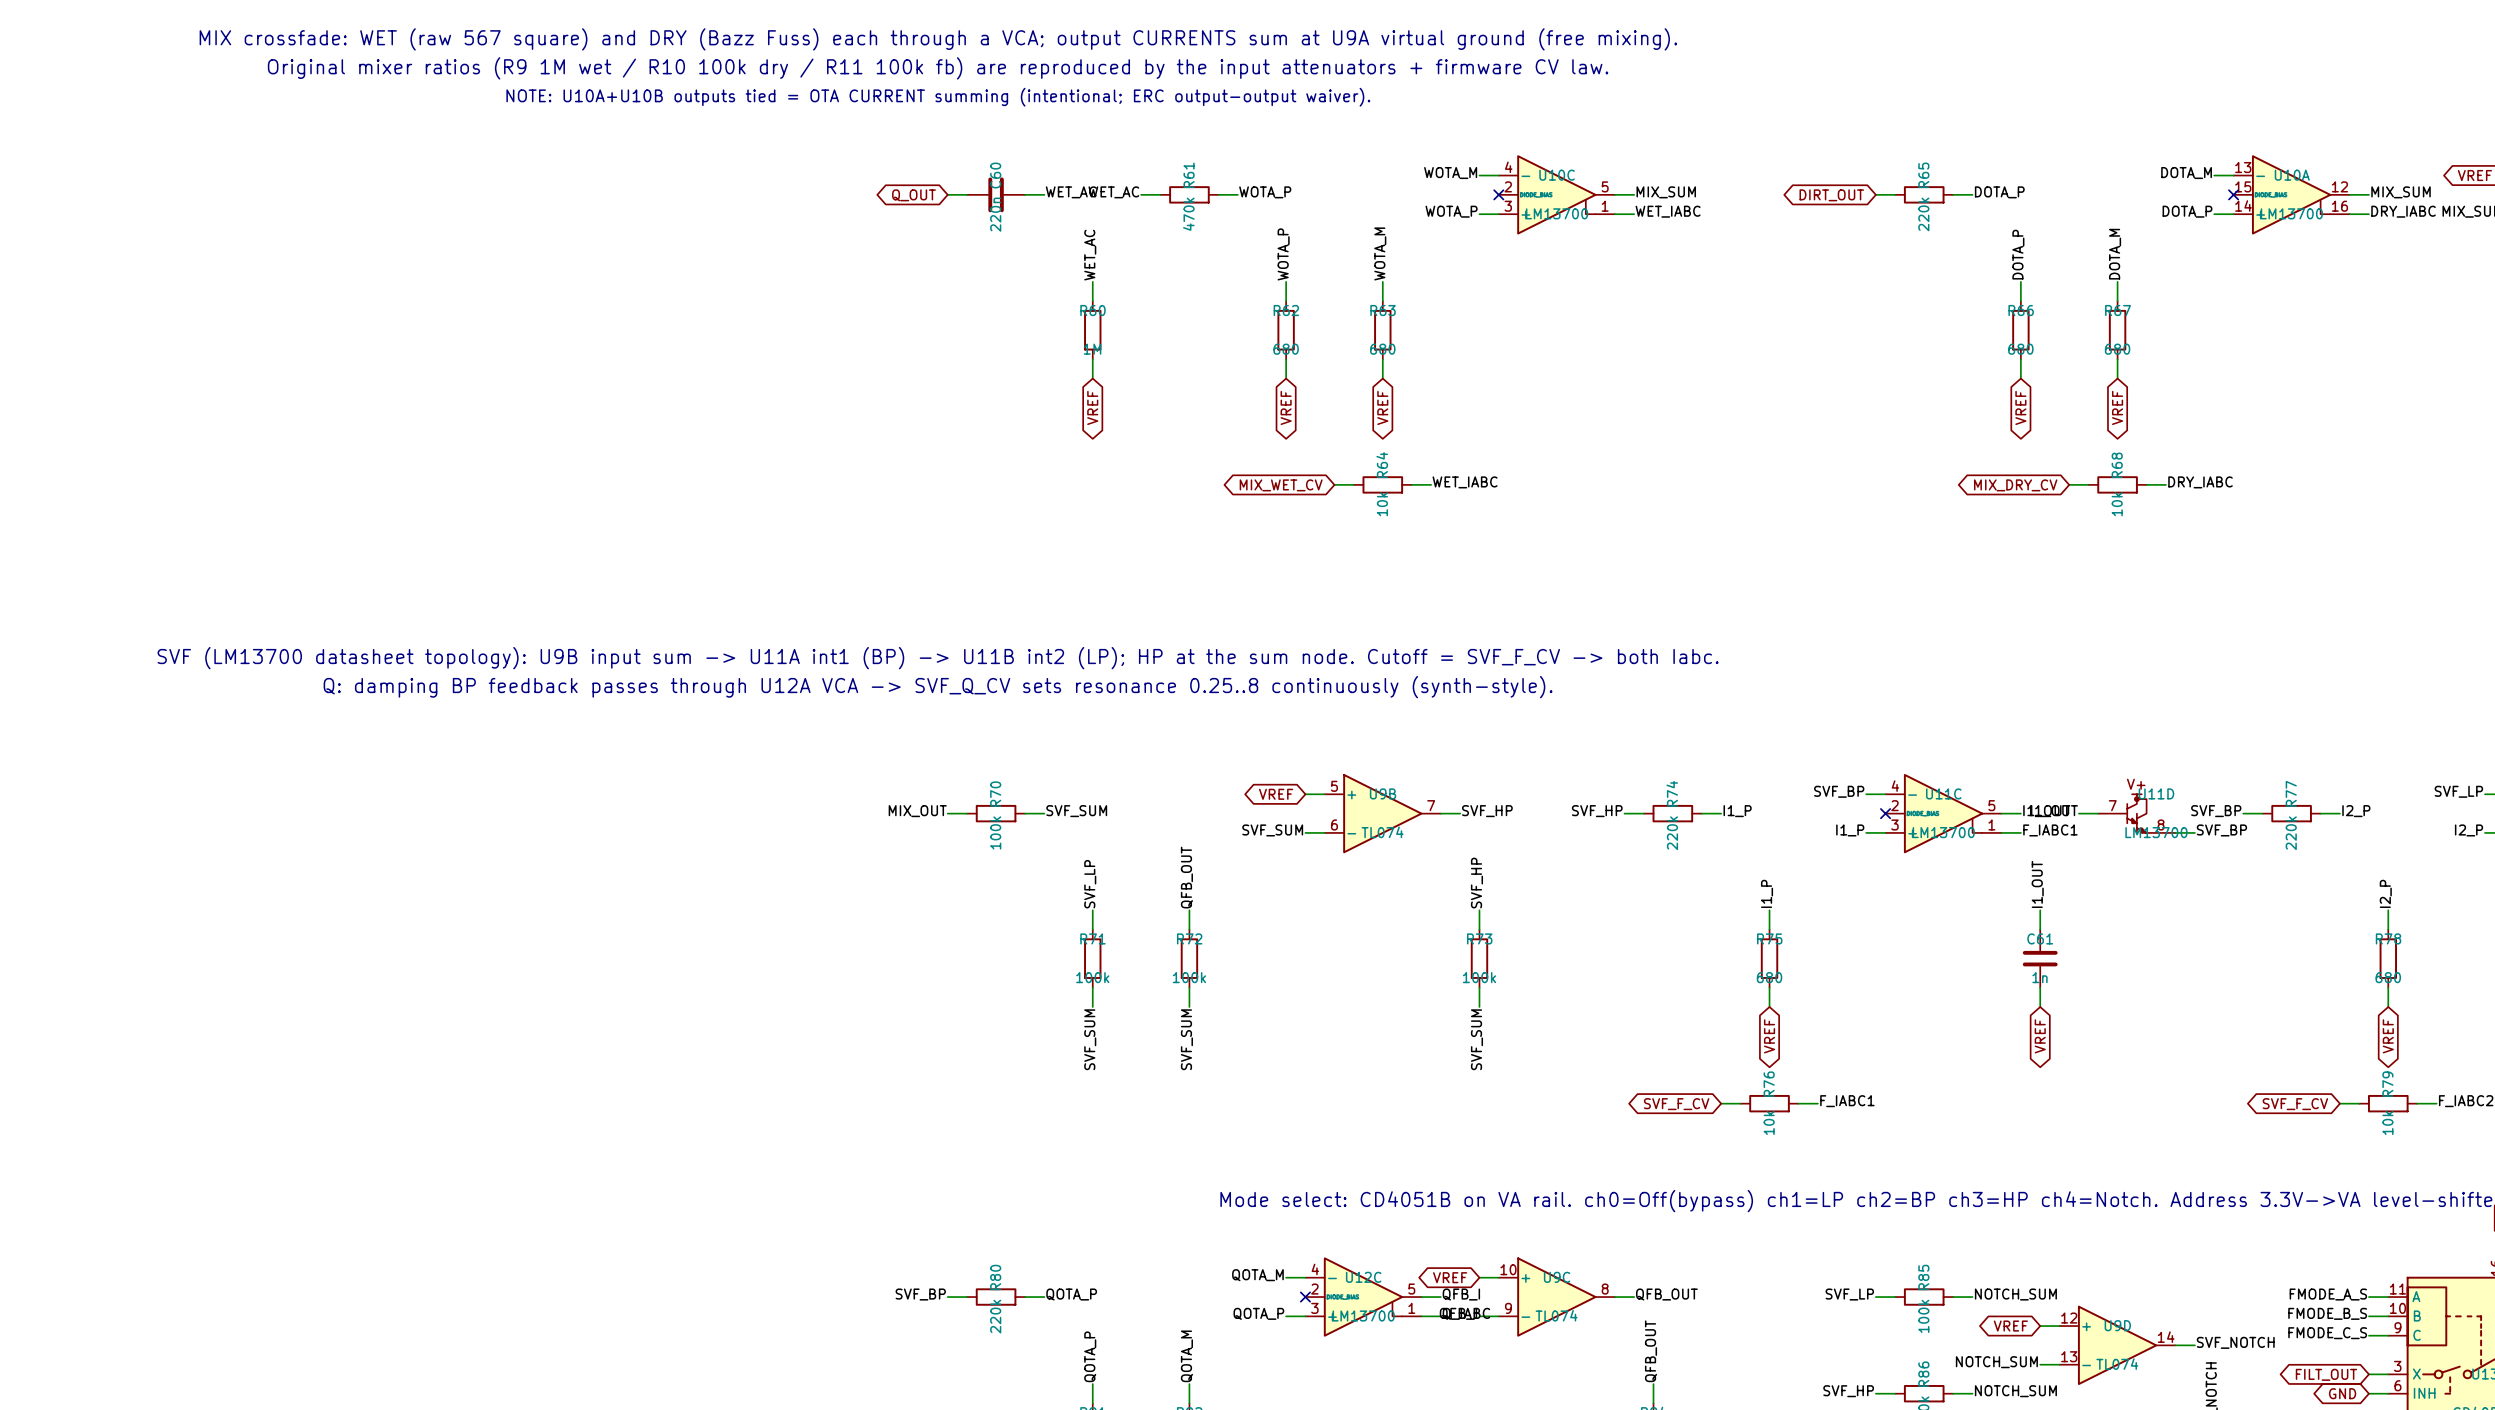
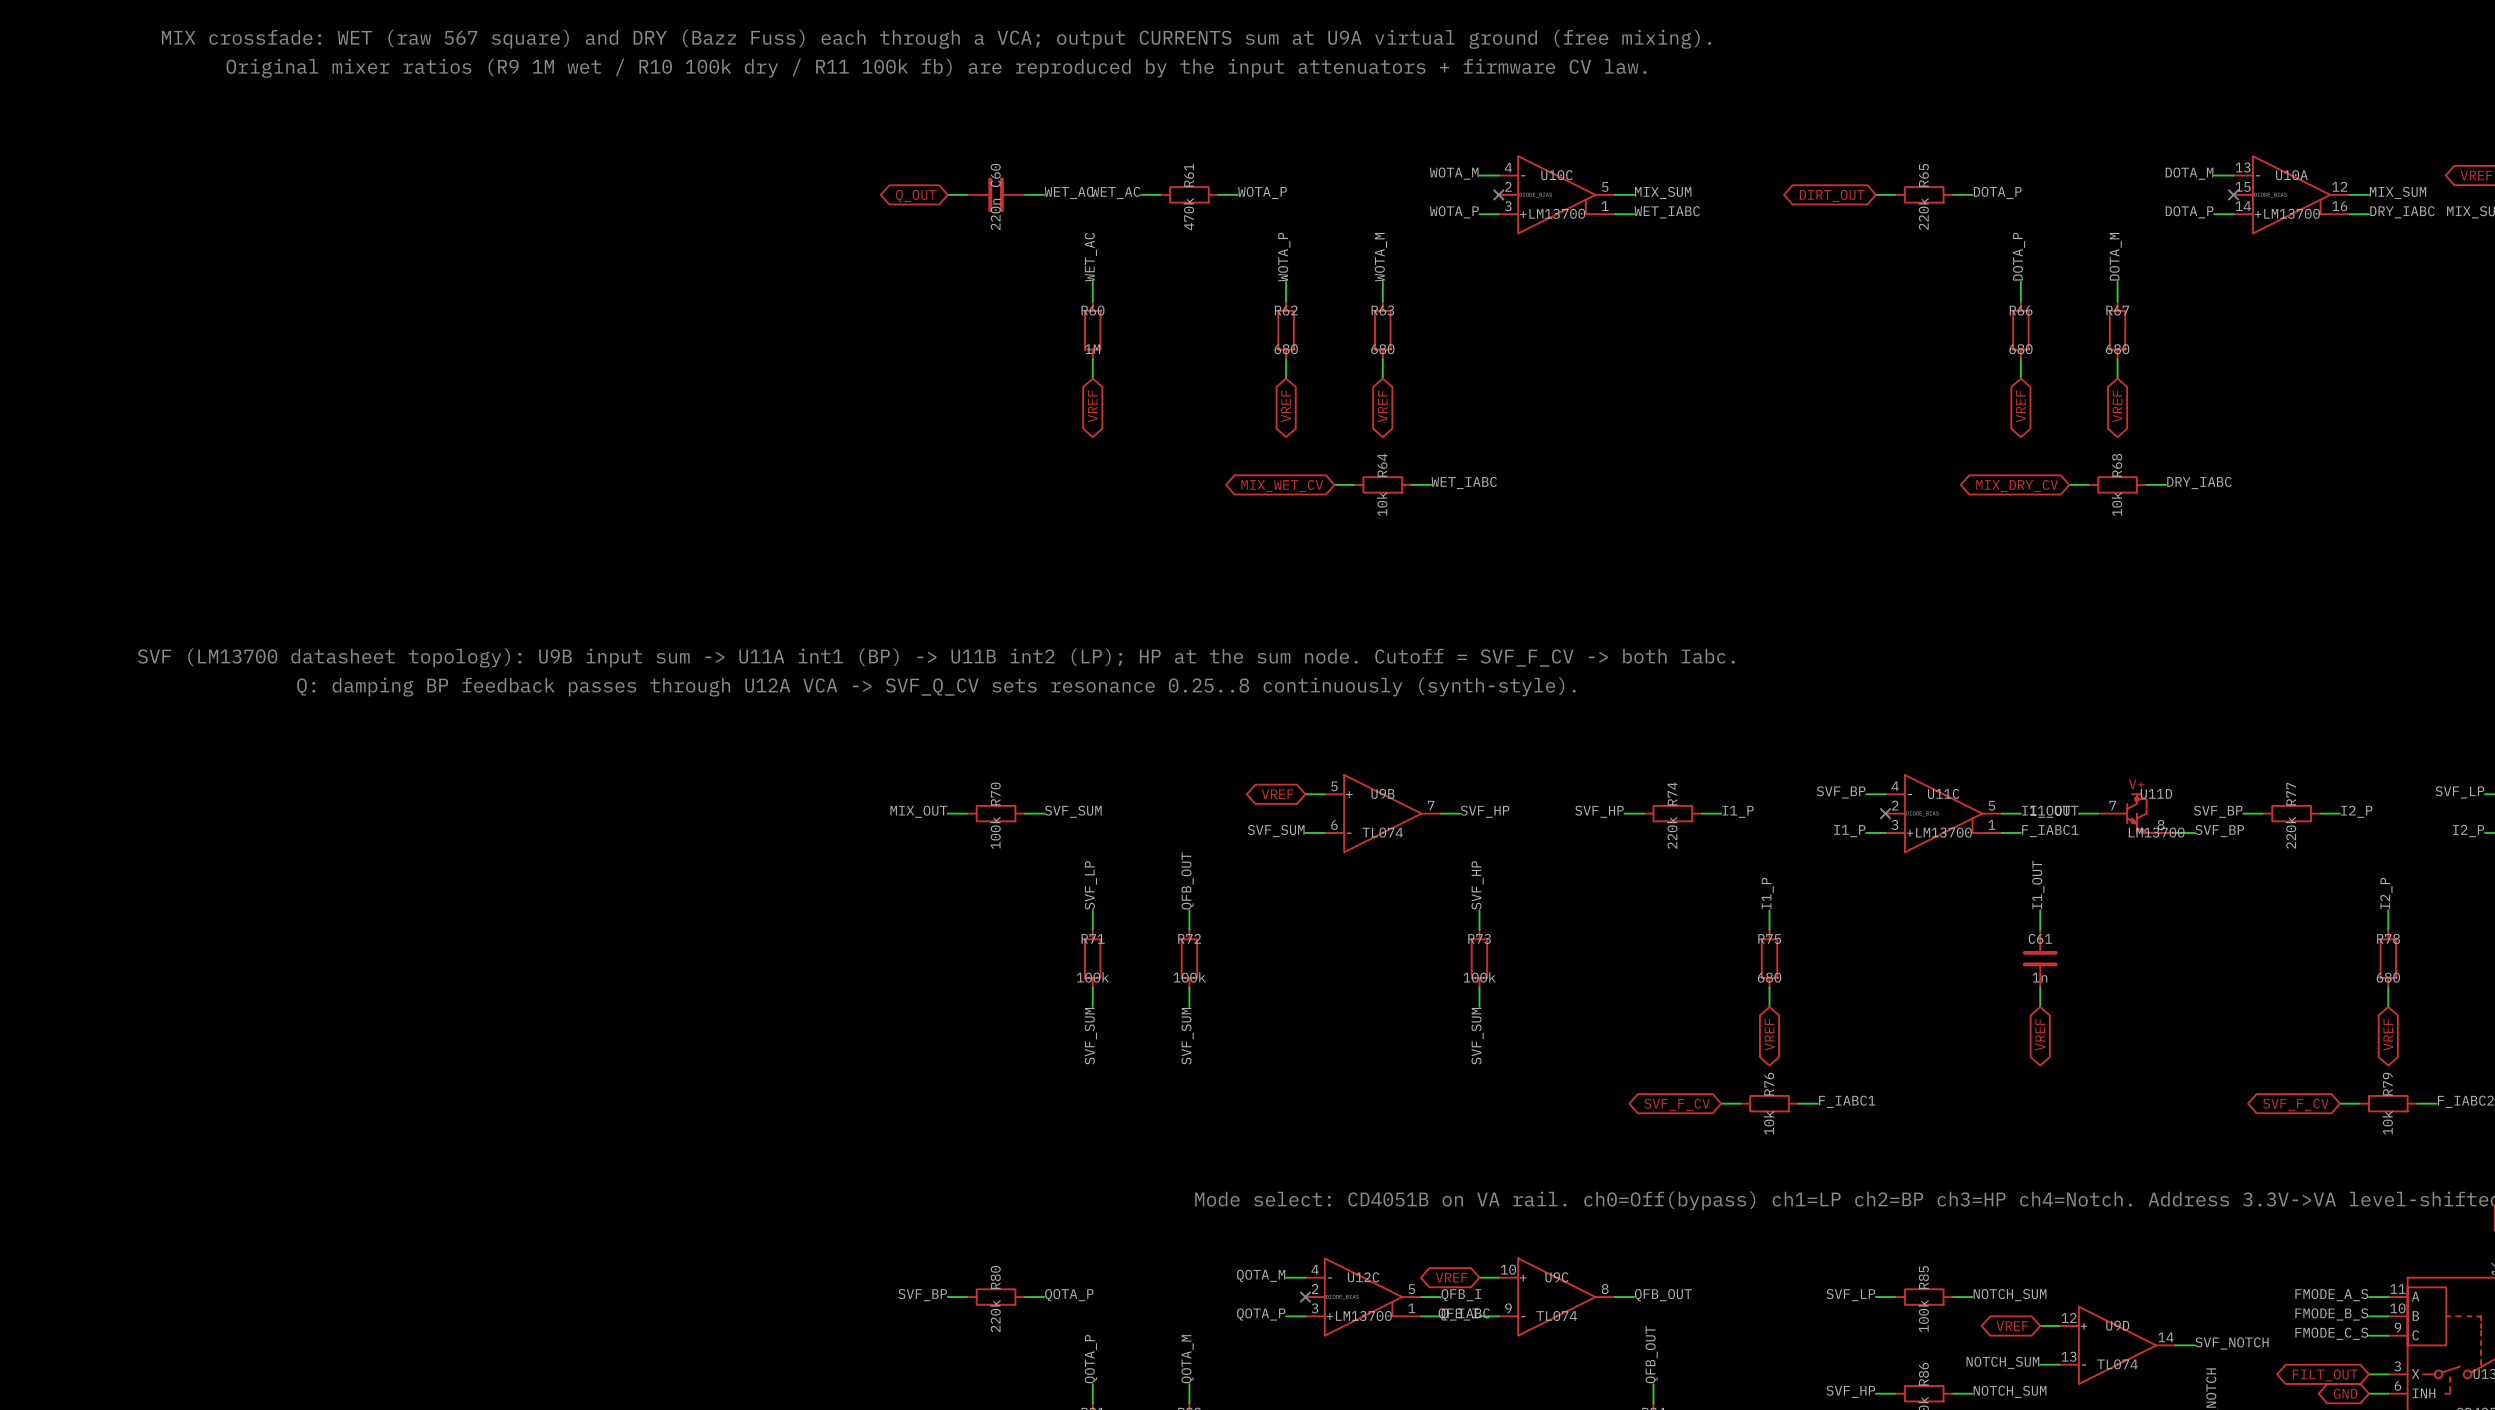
text: NOTE: U10A+U10B outputs tied = OTA CURRENT summing (intentional; ERC output-output waiver). (938, 97) -> none

